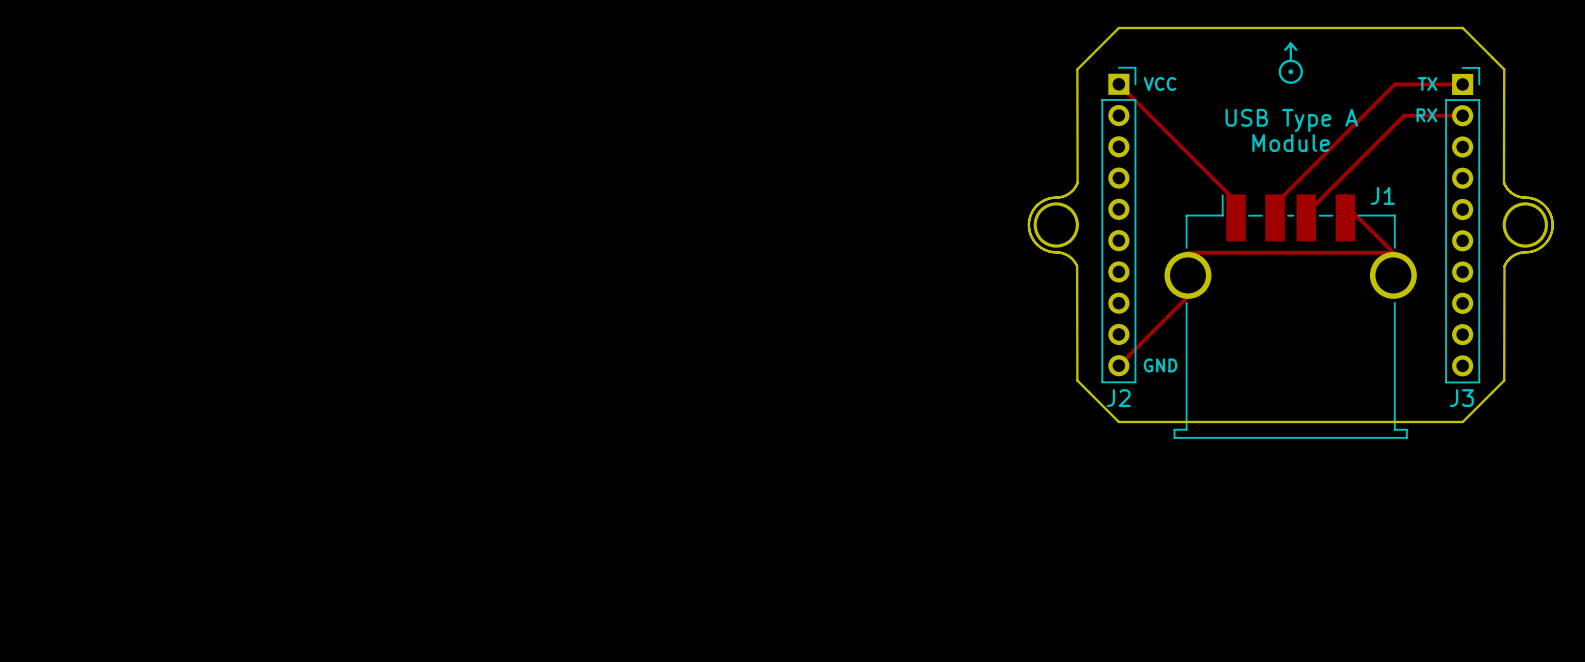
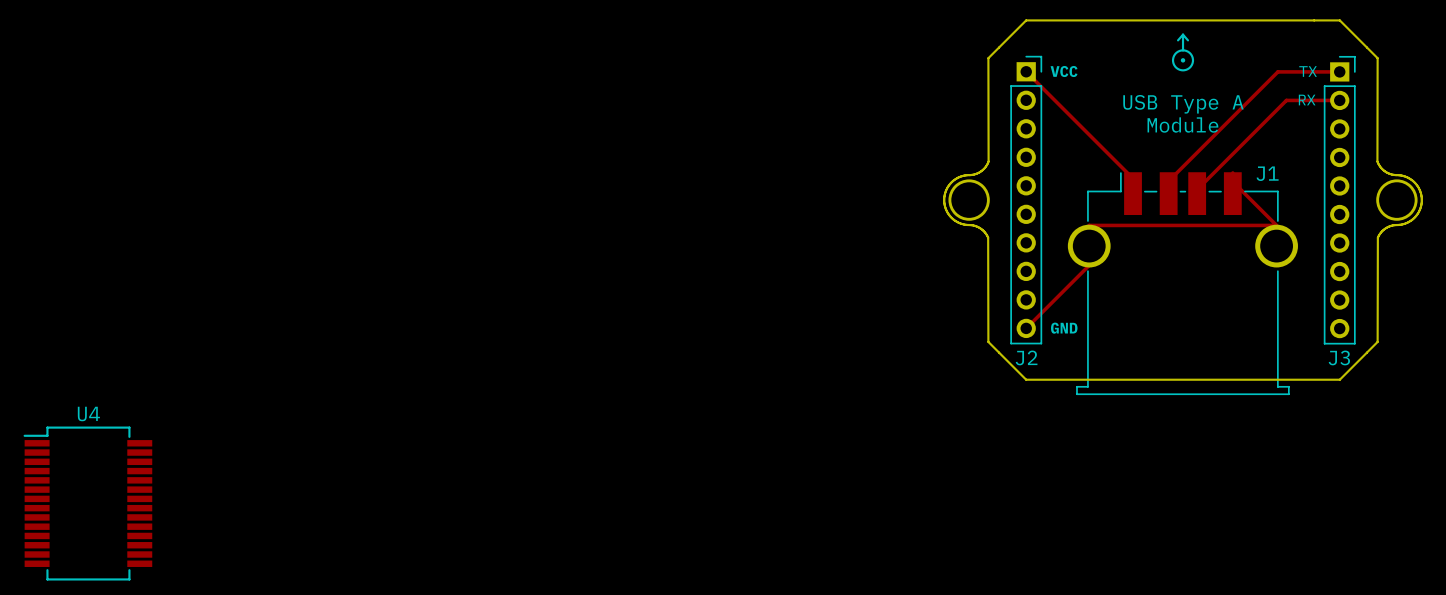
U4: none -> (87, 503)

